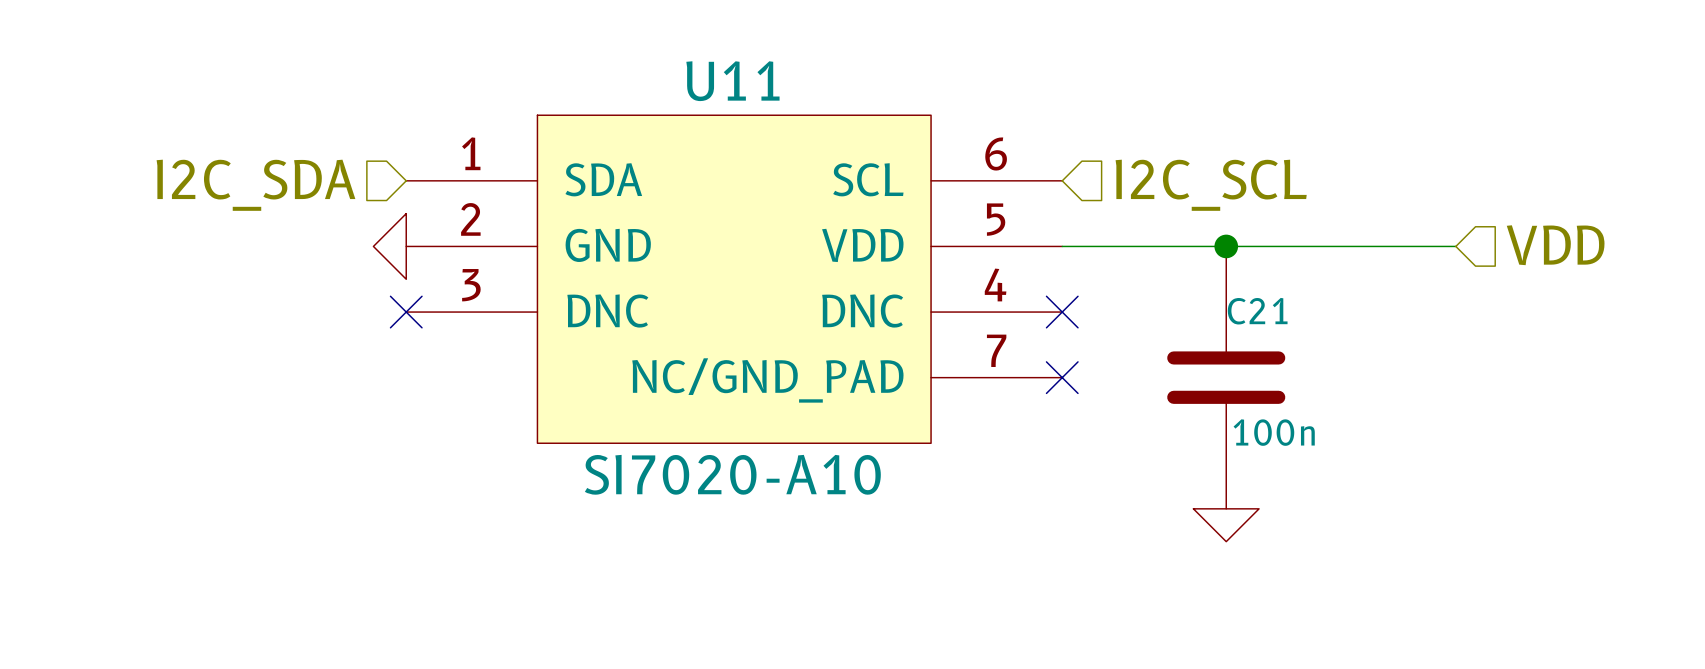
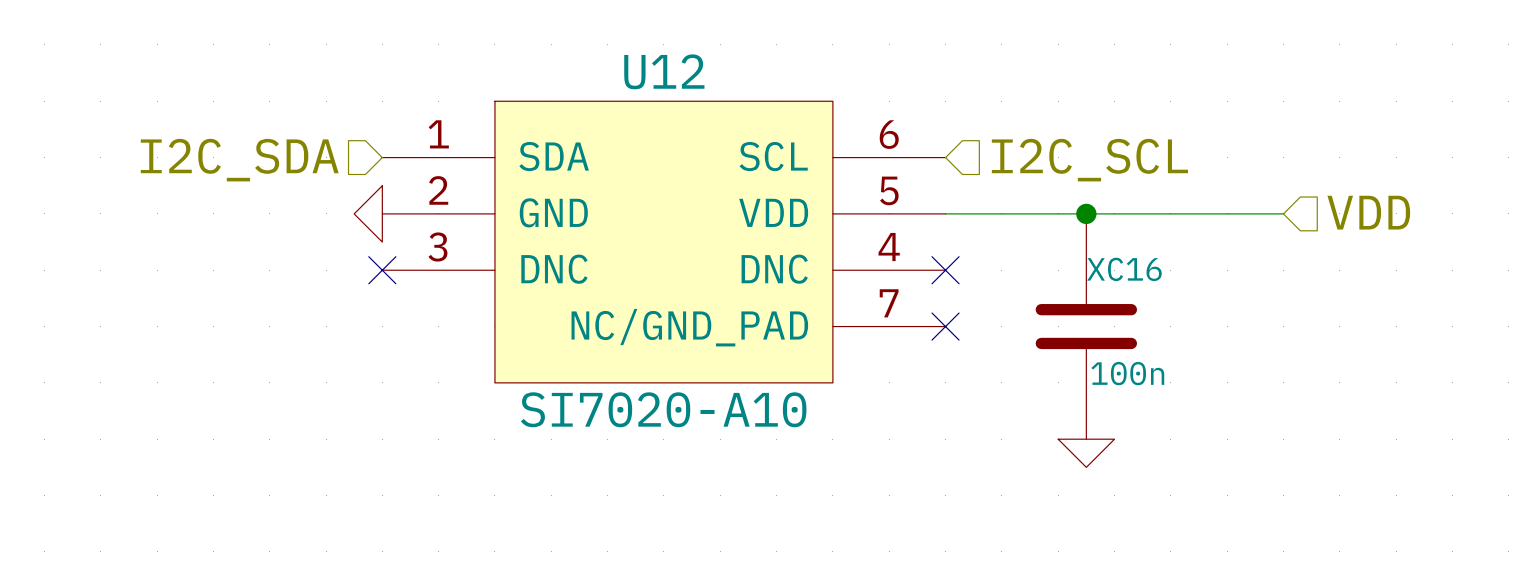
U11 name: U11 (732, 81) -> U12 (664, 71)
C21 name: C21 (1257, 311) -> XC16 (1124, 269)

